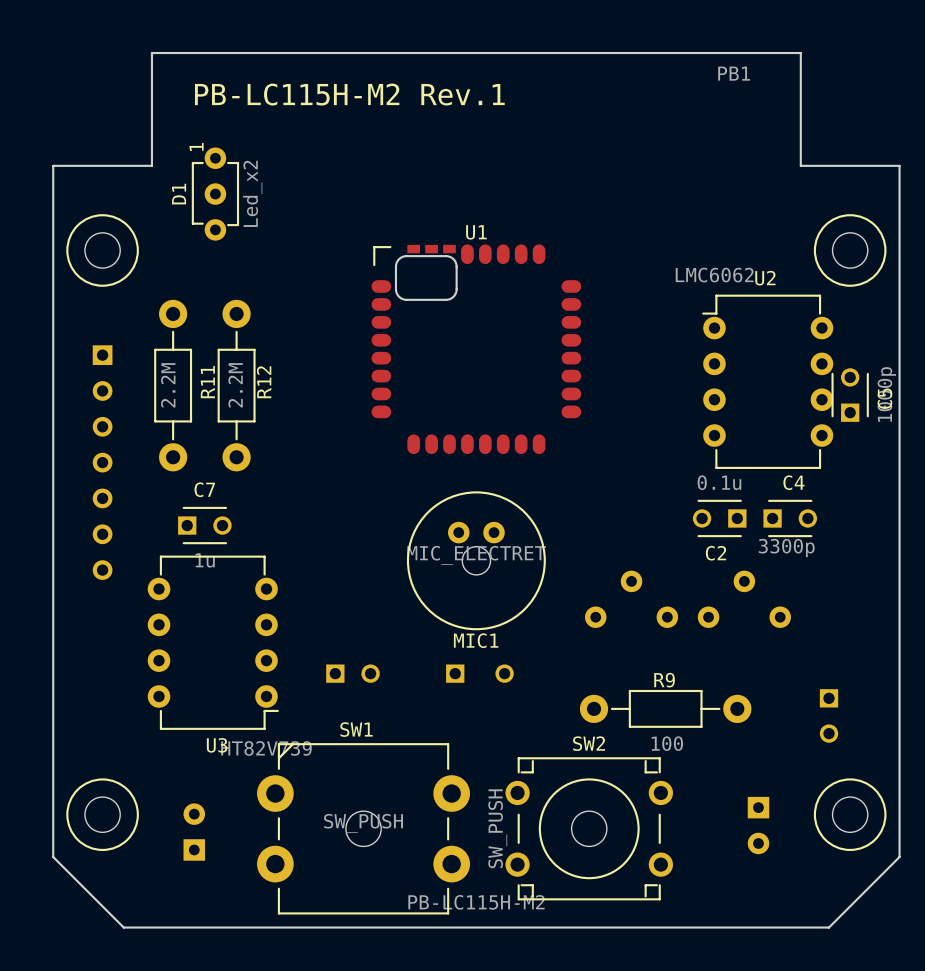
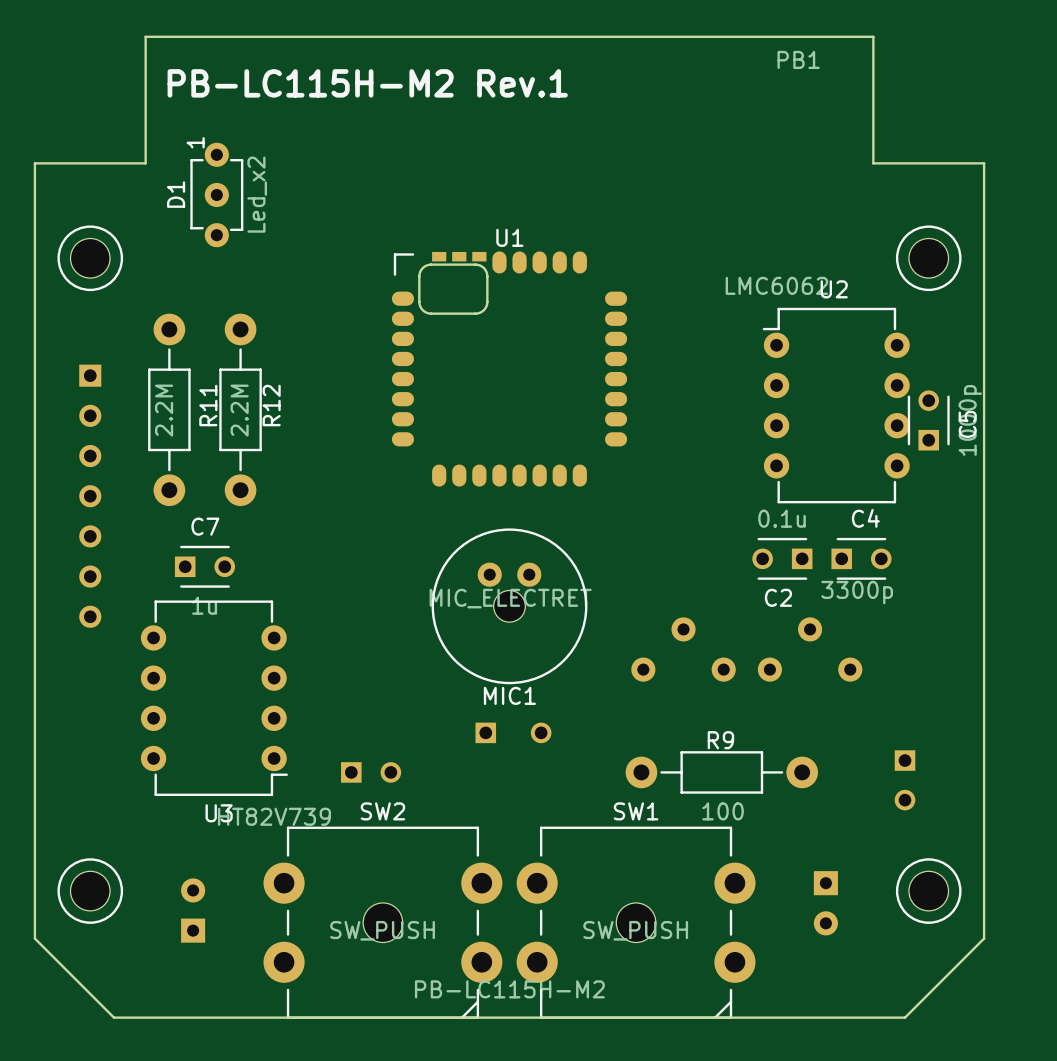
PB1 footprint: [52, 51, 901, 929] -> [33, 35, 986, 1019]
part position: (352, 673) -> (371, 772)
SW2 footprint: [505, 757, 674, 901] -> [263, 826, 503, 1019]
SW1 rotation: 0° (363, 828) -> 180° (636, 922)
SW1 position: (363, 828) -> (636, 922)
SW2 value position: SW_PUSH (497, 828) -> SW_PUSH (382, 930)

